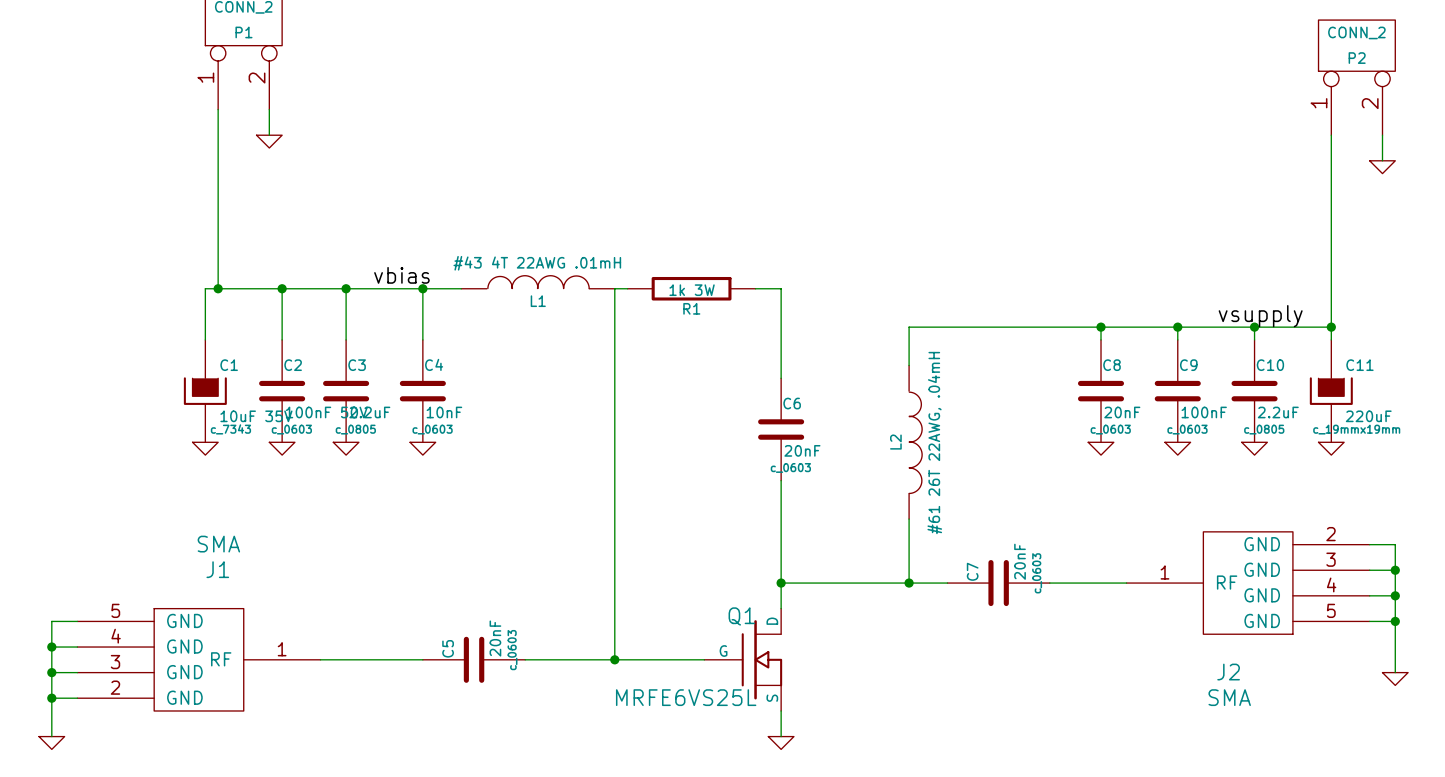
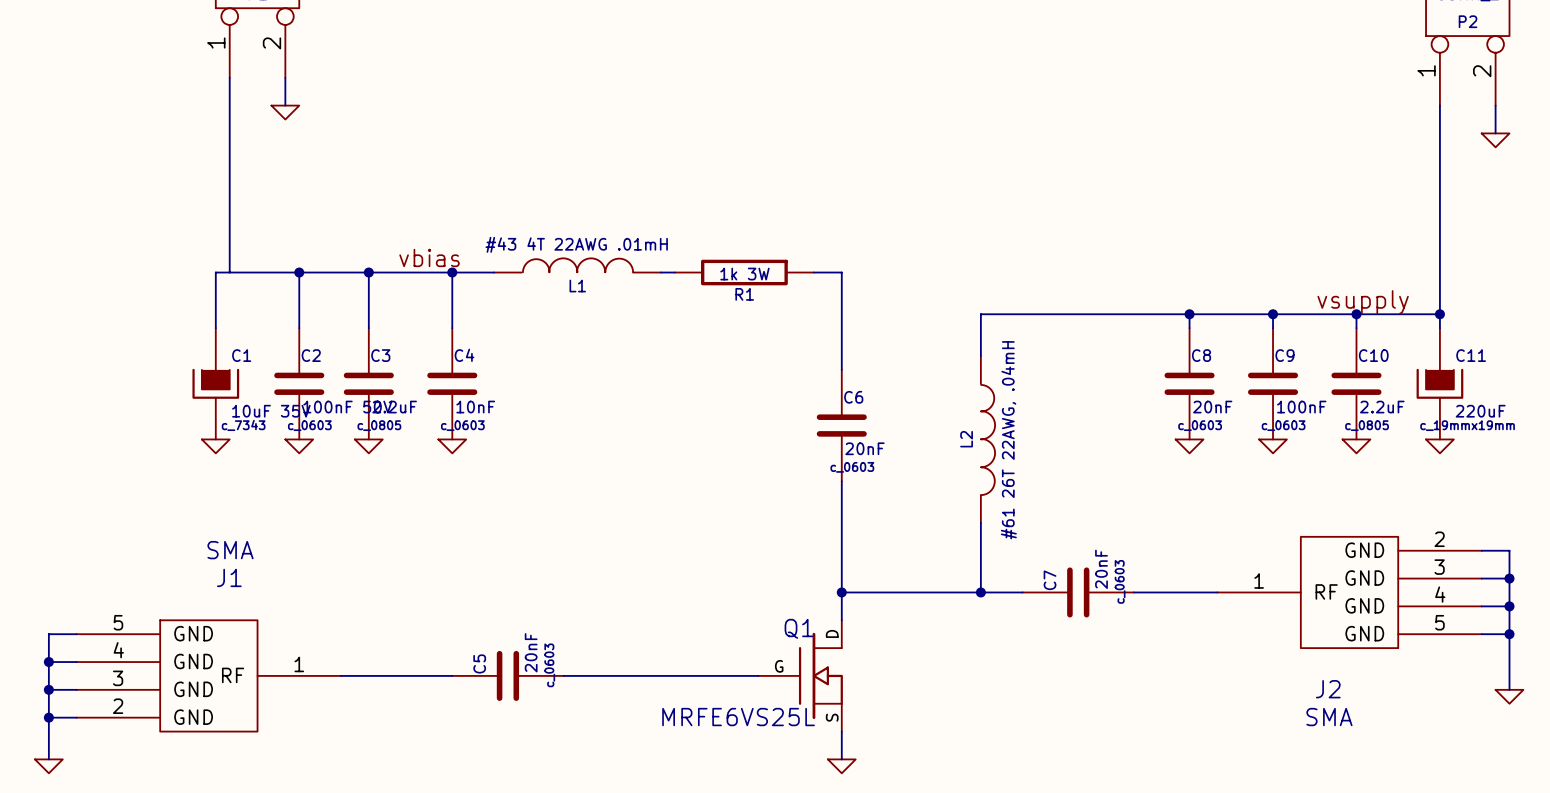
junction: (218, 288) -> none
wire: (614, 288) (614, 659) -> none
junction: (614, 659) -> none

